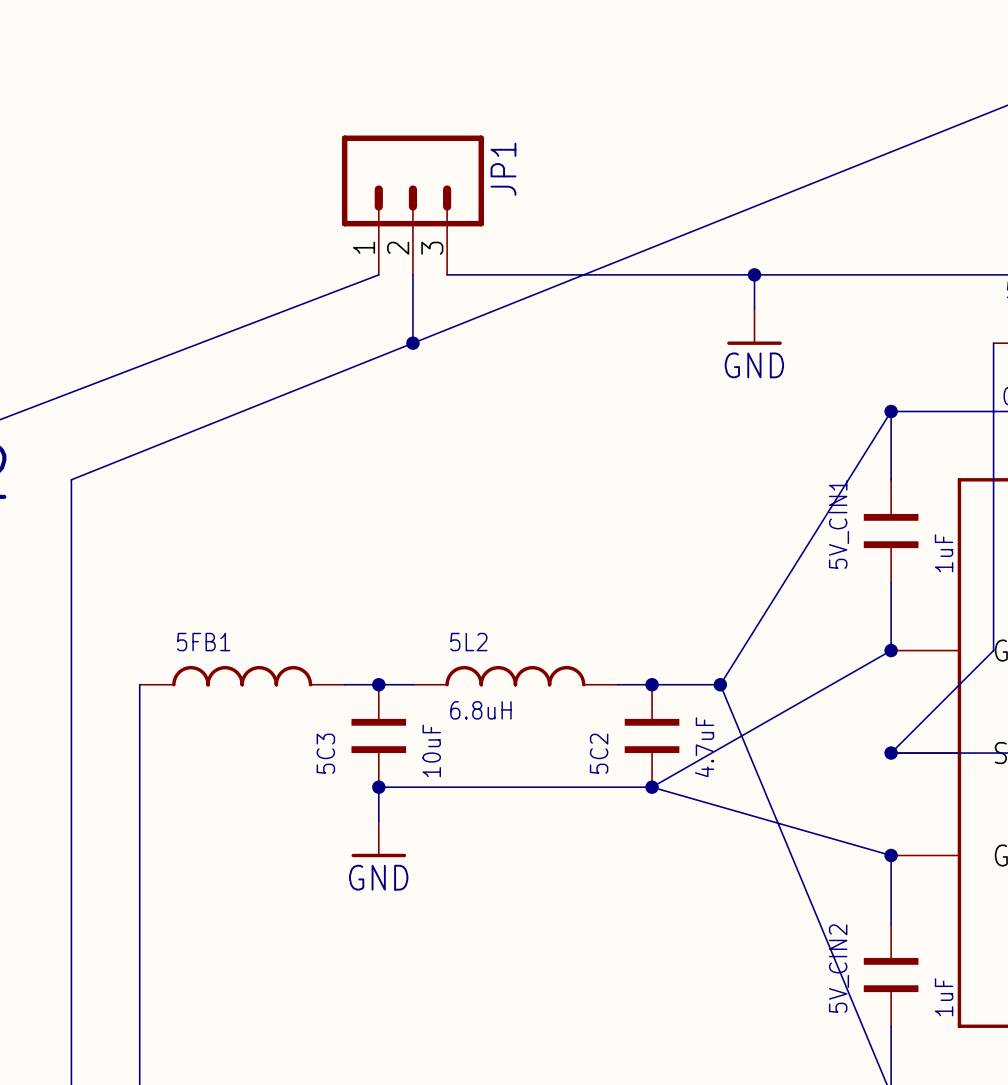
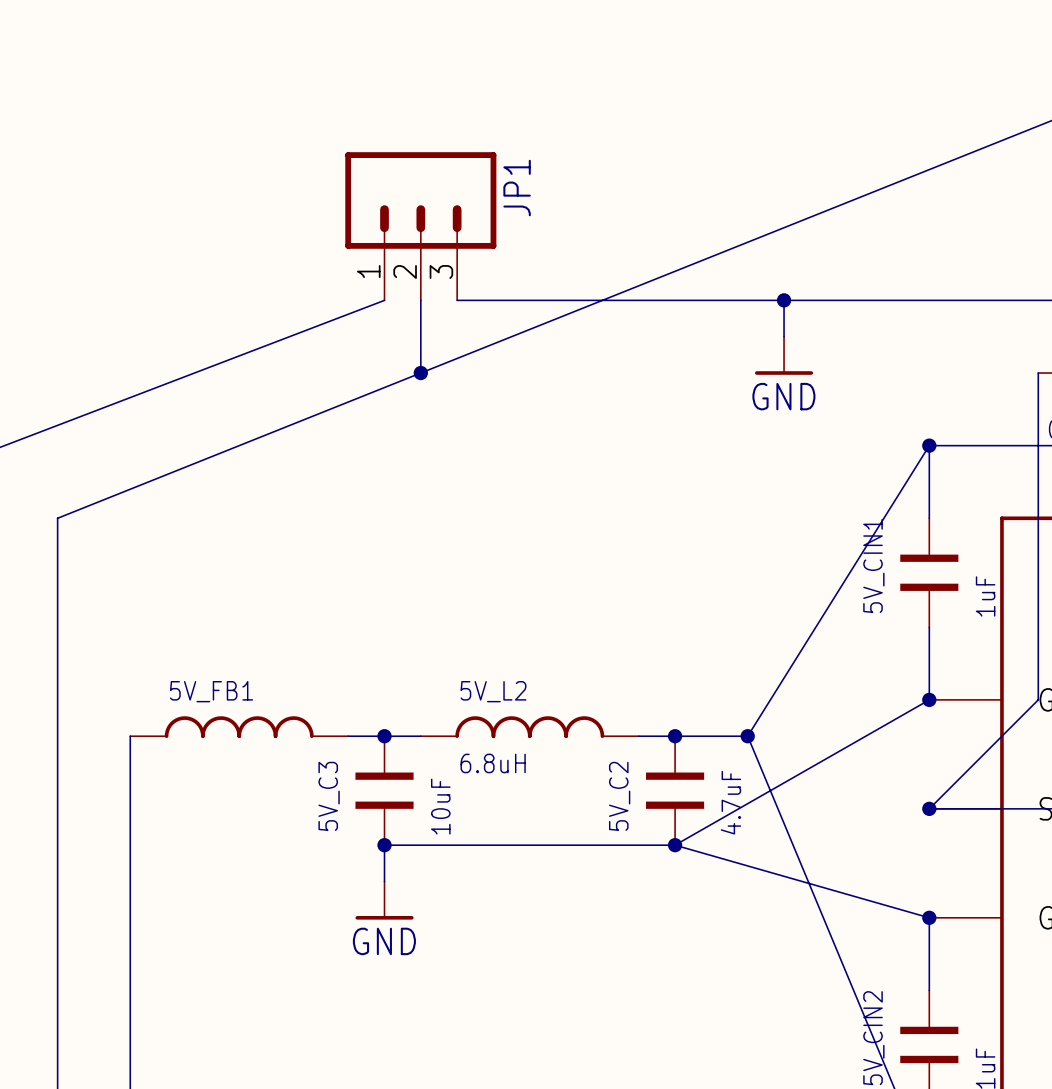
5FB1 name: 5FB1 (203, 642) -> 5V_FB1 (211, 691)
5L2 name: 5L2 (468, 642) -> 5V_L2 (493, 691)
5C3 name: 5C3 (325, 753) -> 5V_C3 (329, 796)
5C2 name: 5C2 (599, 753) -> 5V_C2 (619, 796)

